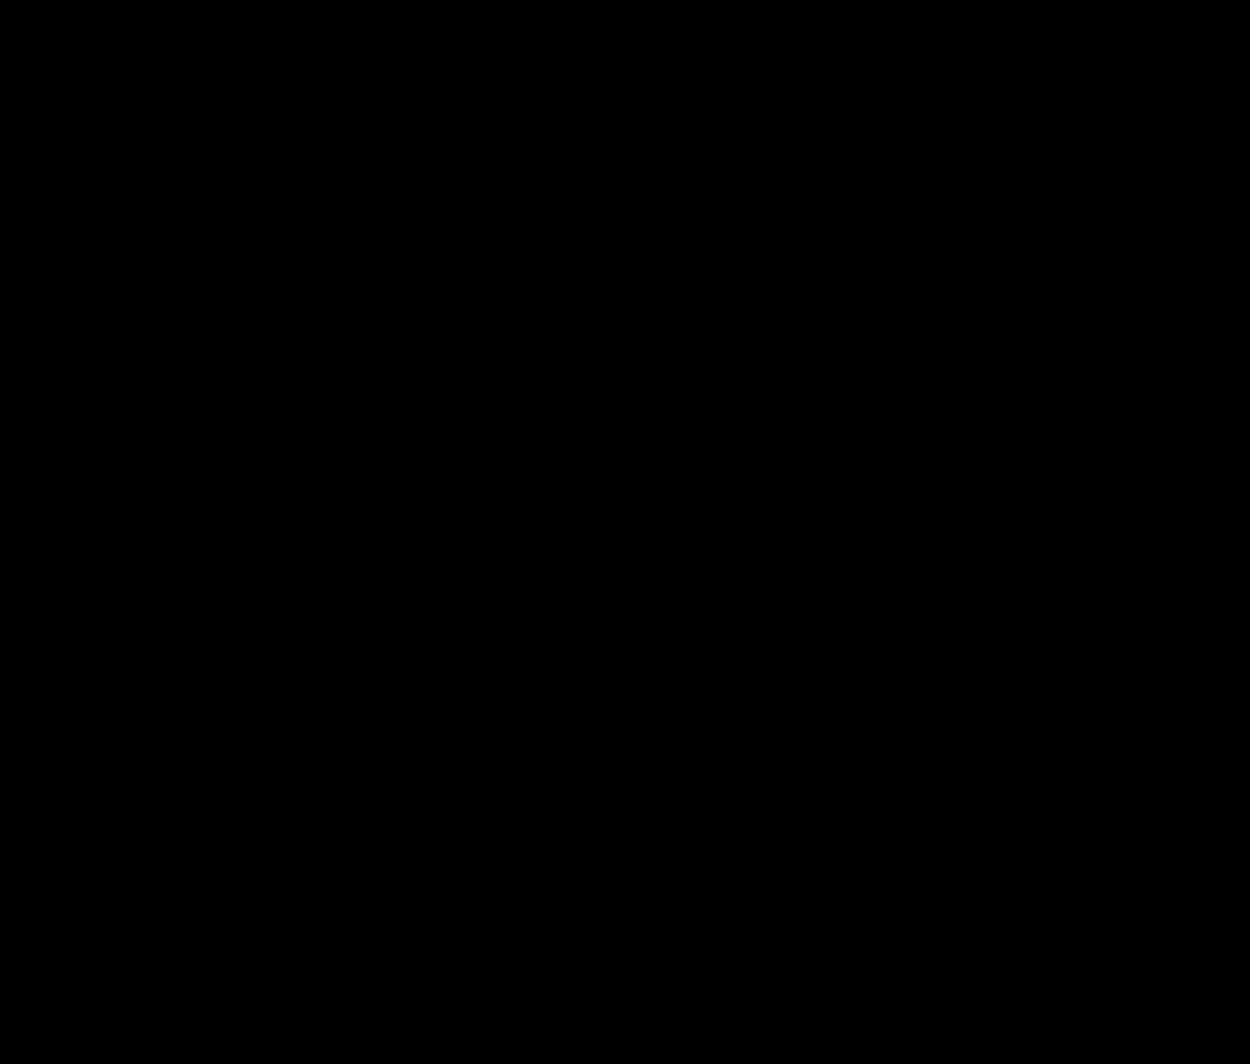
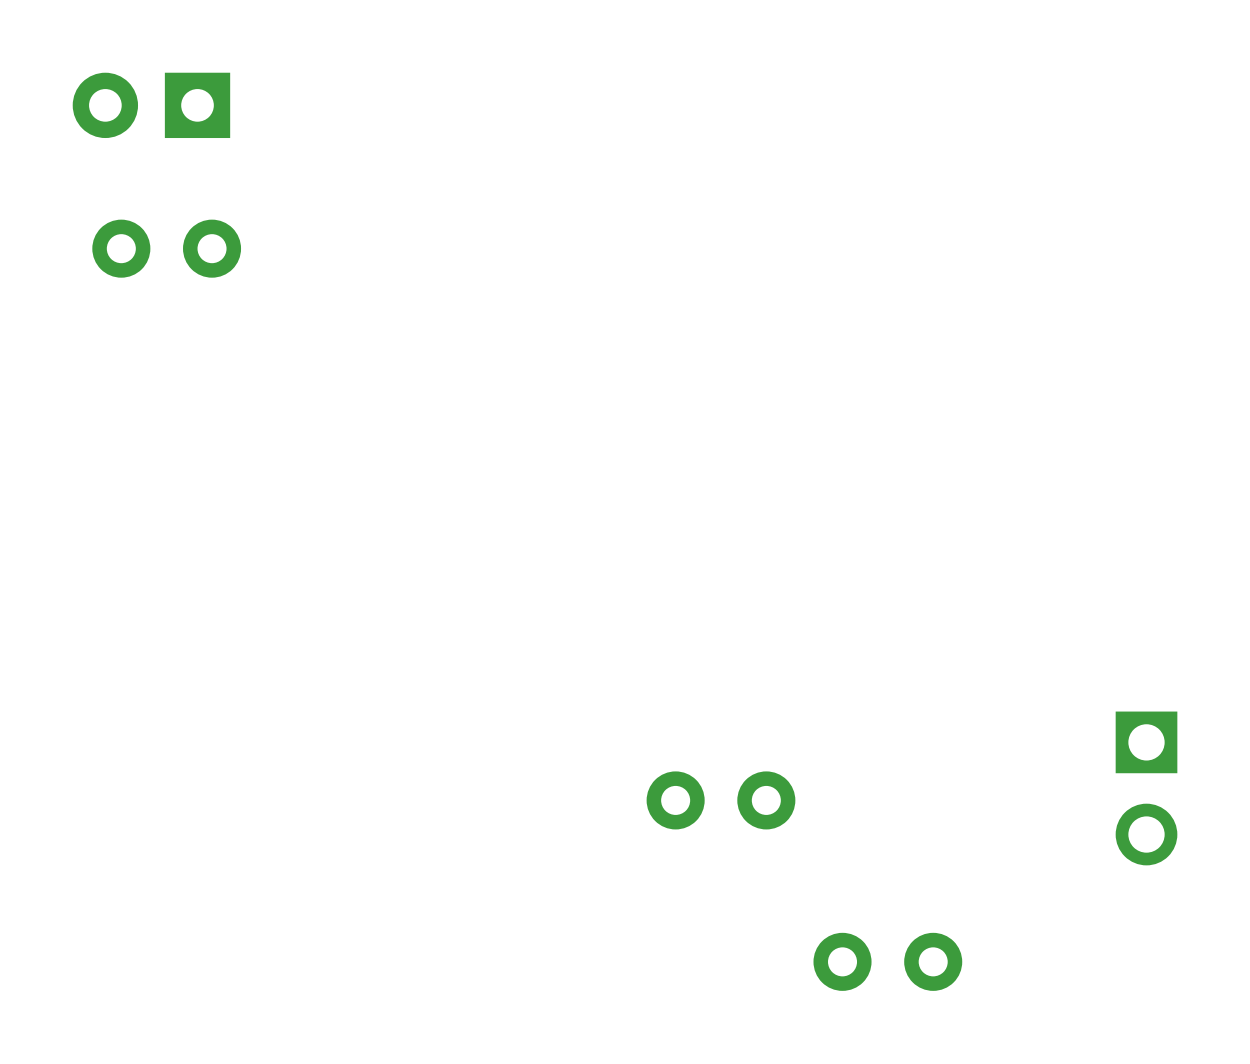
part: none -> (151, 105)
part: none -> (166, 248)
part: none -> (1146, 788)
part: none -> (720, 800)
part: none -> (887, 961)

